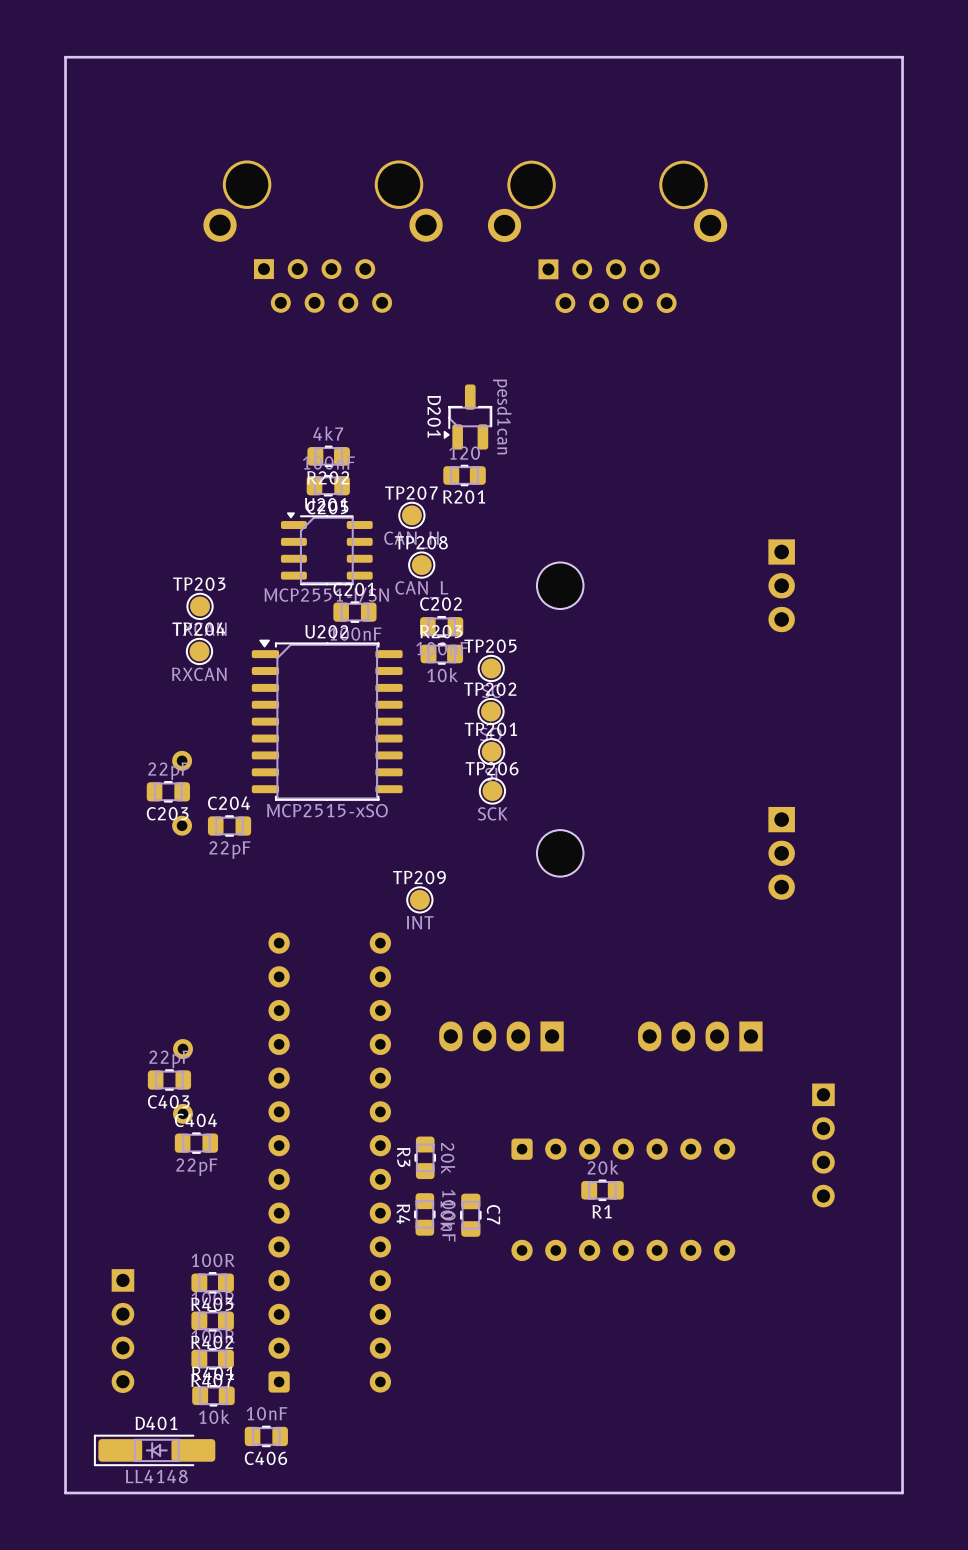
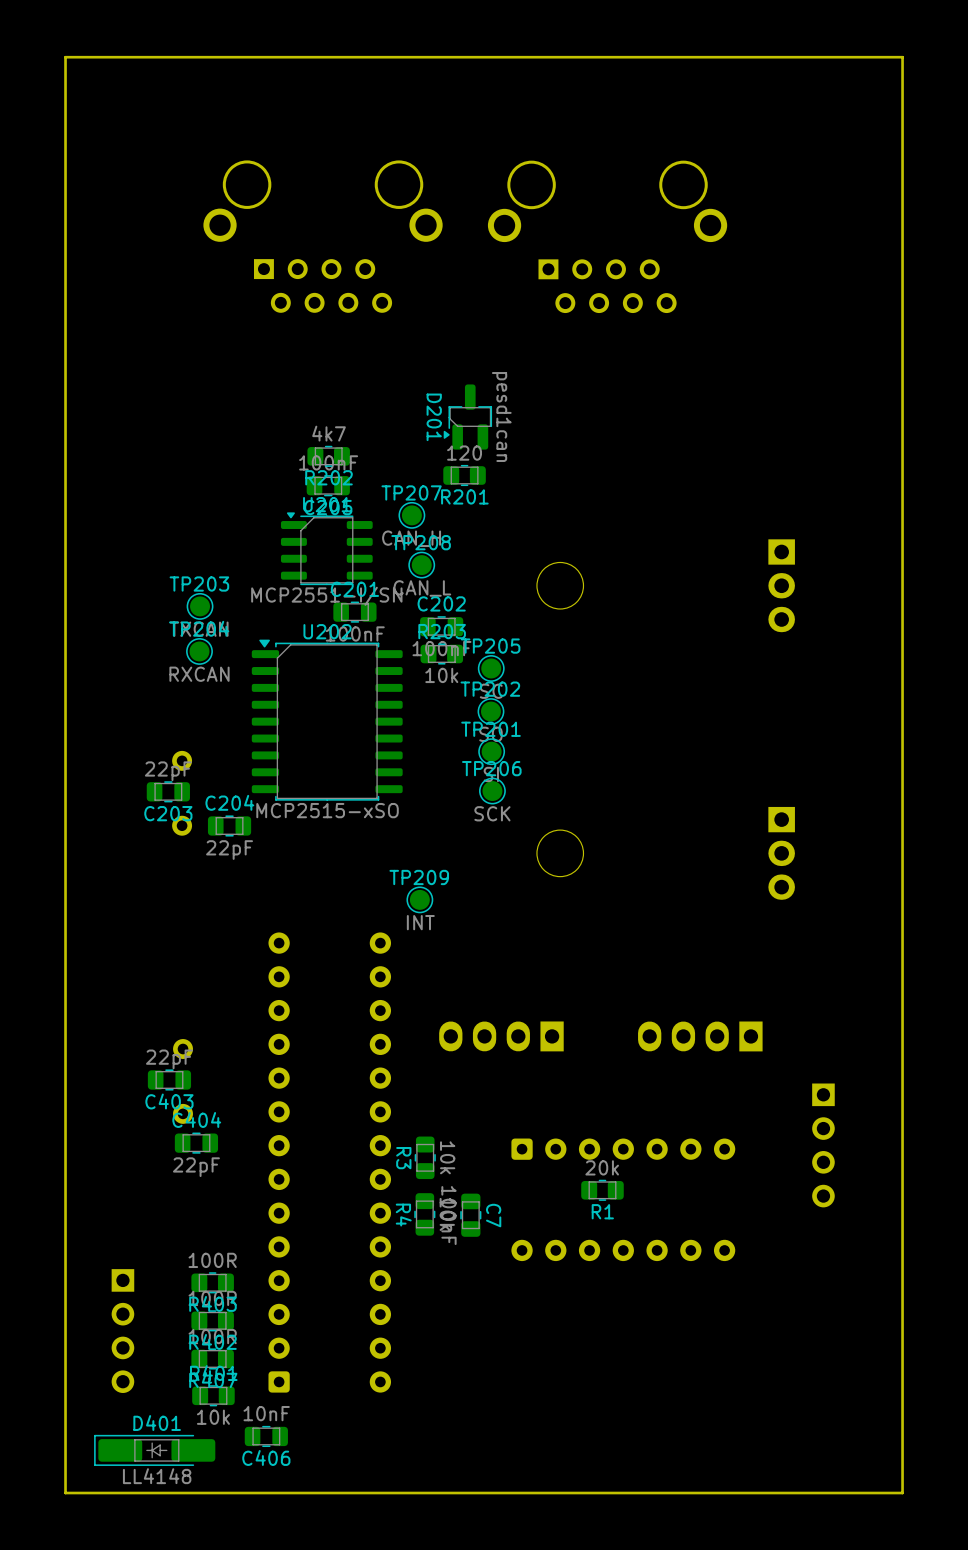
R3 value: 20k (448, 1158) -> 10k (447, 1157)

